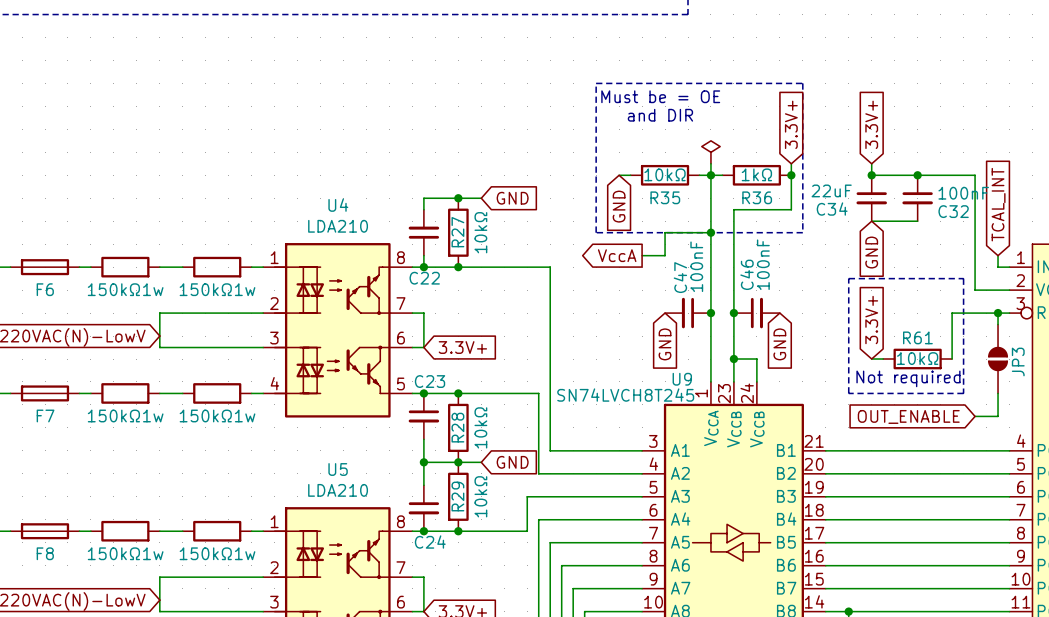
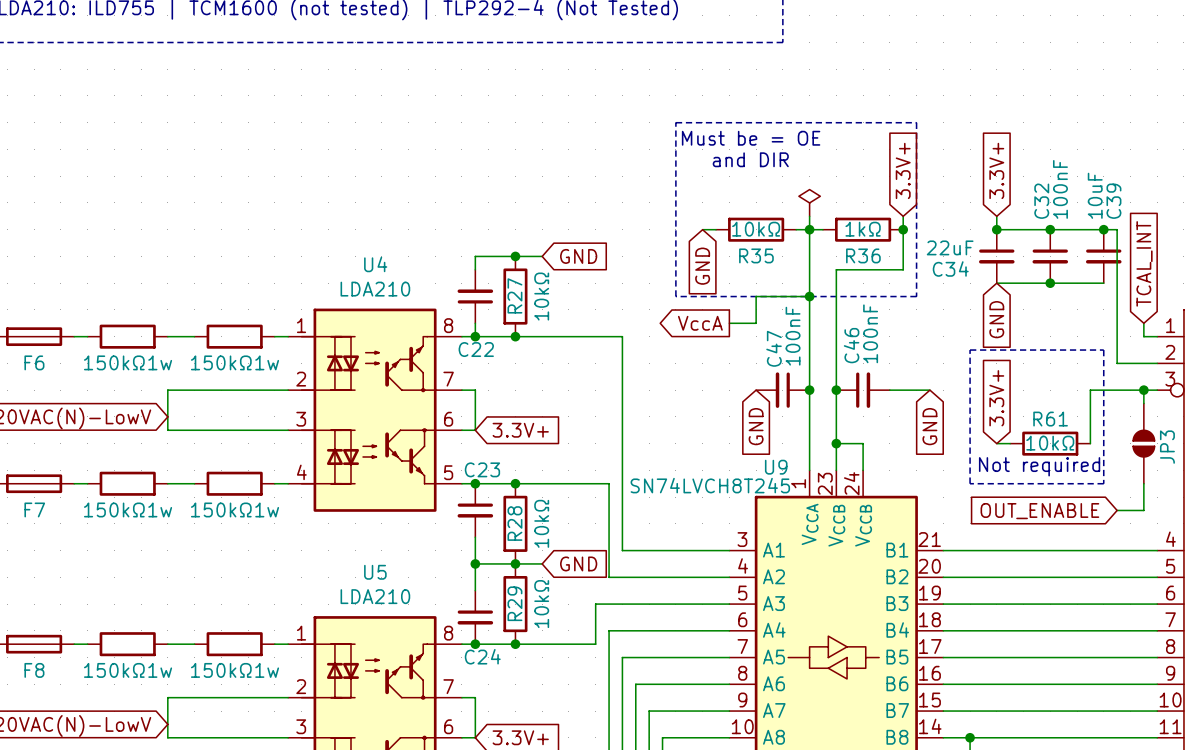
junction: none -> (1103, 229)
C32 value rotation: 0° (963, 193) -> 90° counterclockwise (1060, 189)
C32 value position: 100nF (963, 193) -> 100nF (1060, 189)
C39: none -> 10uF (1103, 256)
C32 name rotation: 0° (953, 211) -> 90° counterclockwise (1041, 201)
C32 name position: C32 (953, 211) -> C32 (1041, 201)
wire: none -> (1050, 283) (1103, 283)
junction: none -> (1050, 283)
wire: none -> (889, 390) (929, 390)
global label position: GND (779, 344) -> GND (929, 426)

